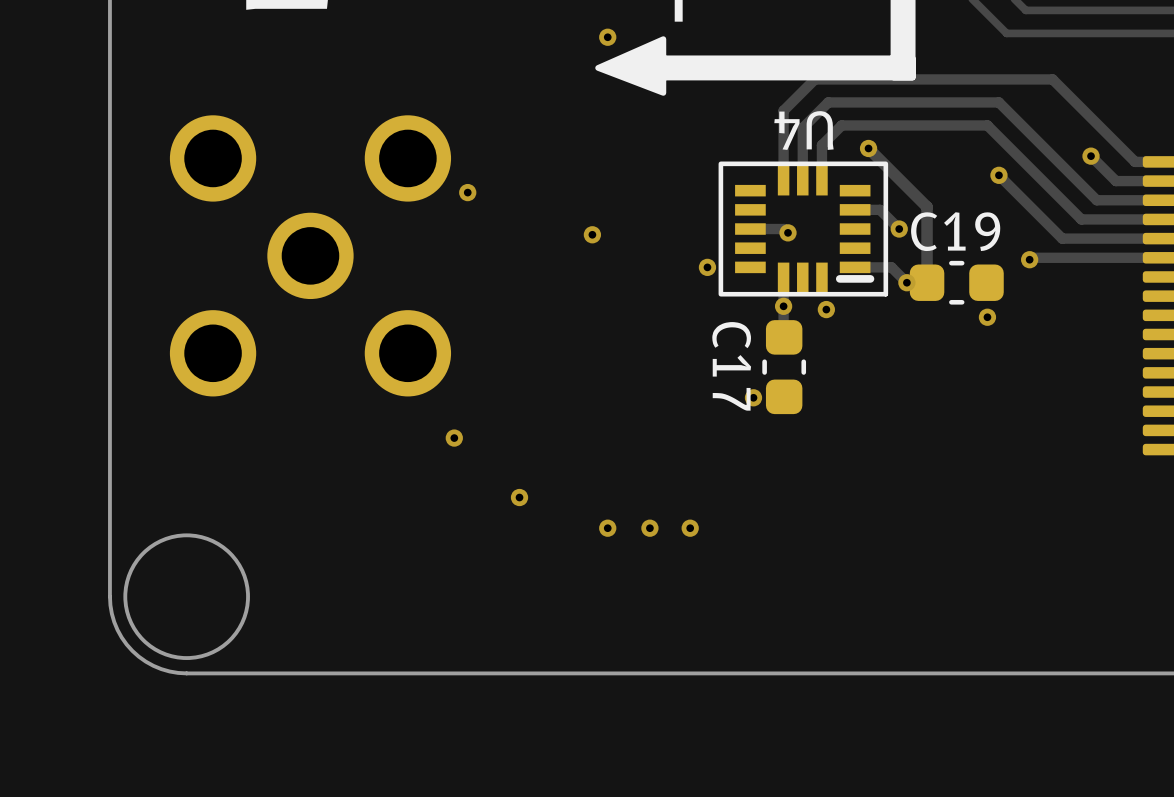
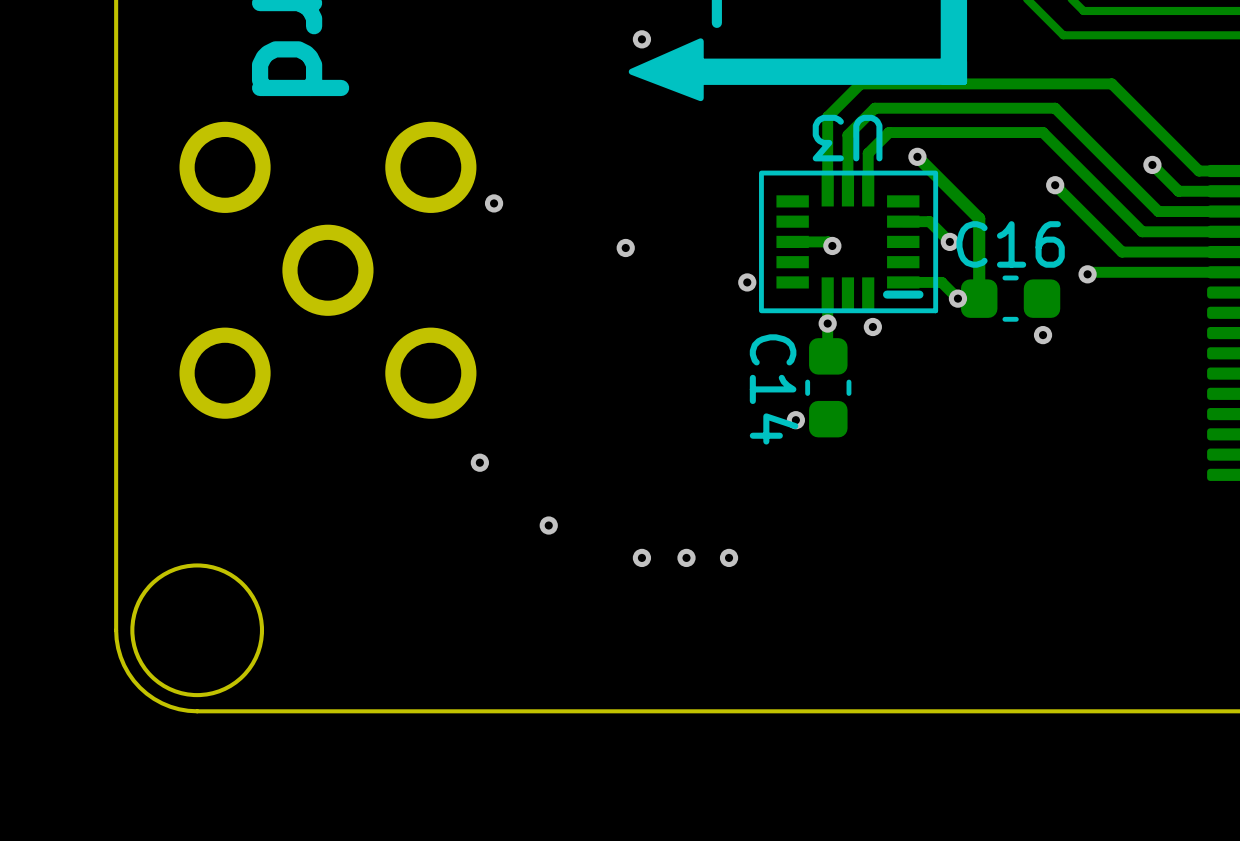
U4 name: U4 (803, 130) -> U3 (847, 138)
C19 name: C19 (955, 231) -> C16 (1010, 244)
C17 name: C17 (731, 366) -> C14 (774, 389)

